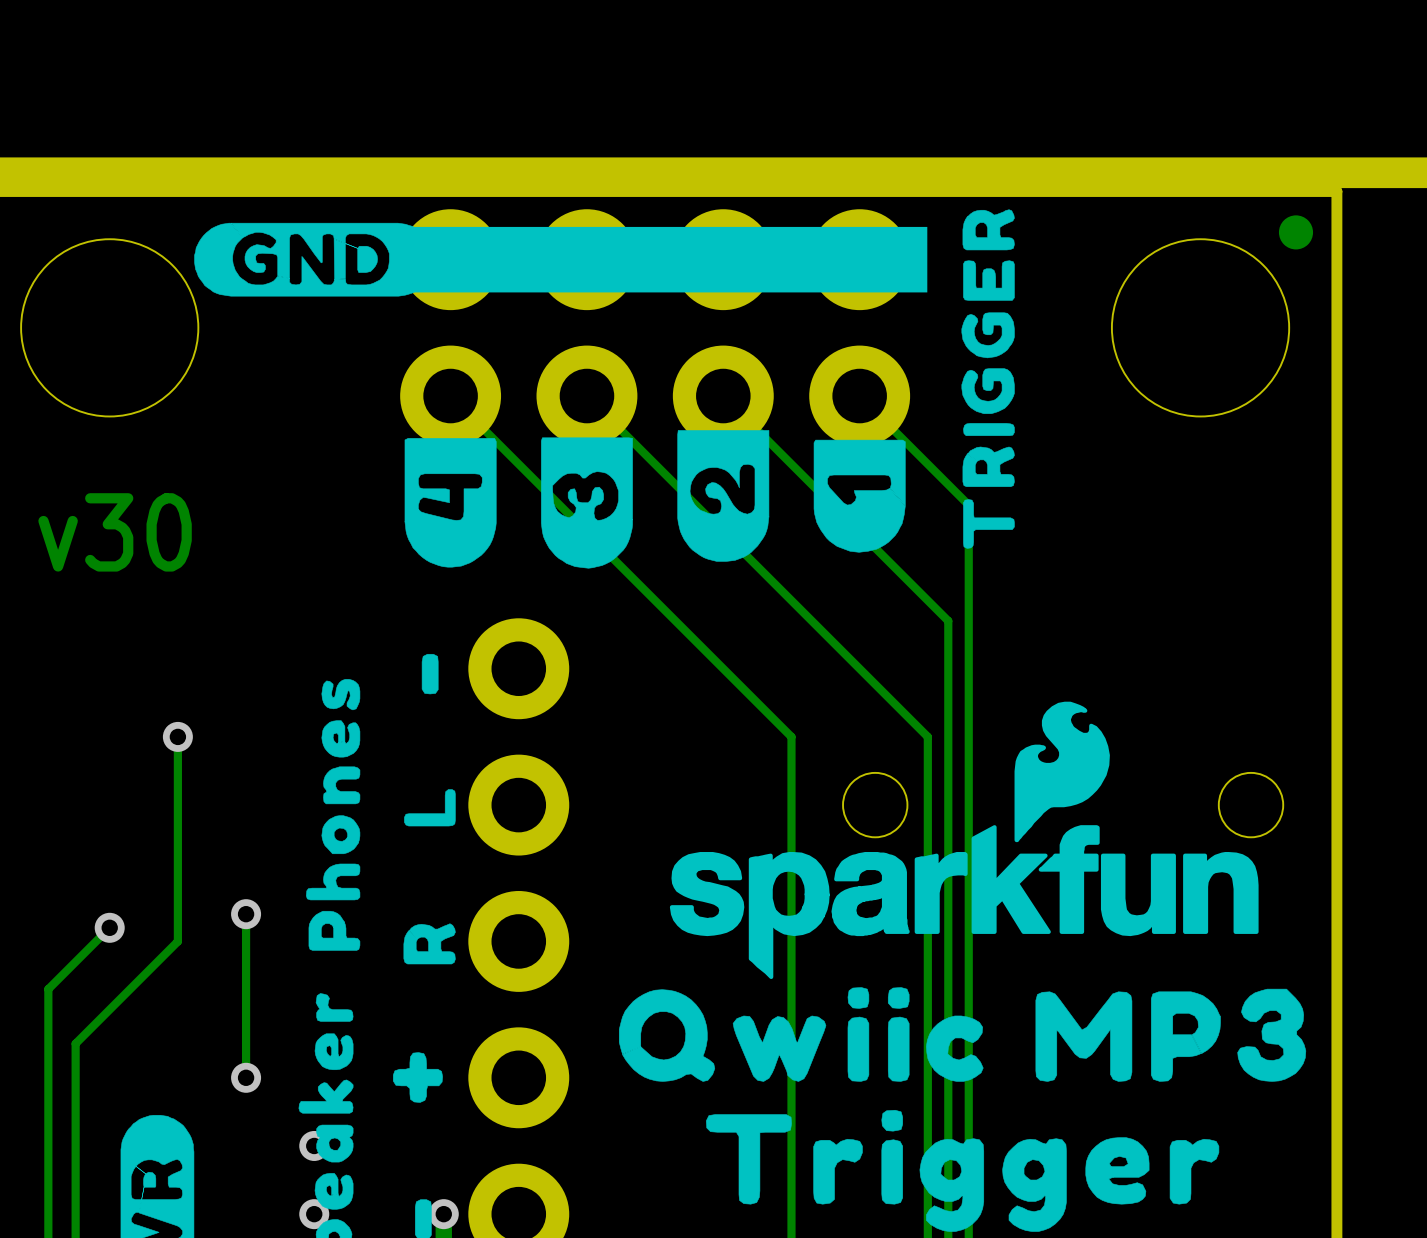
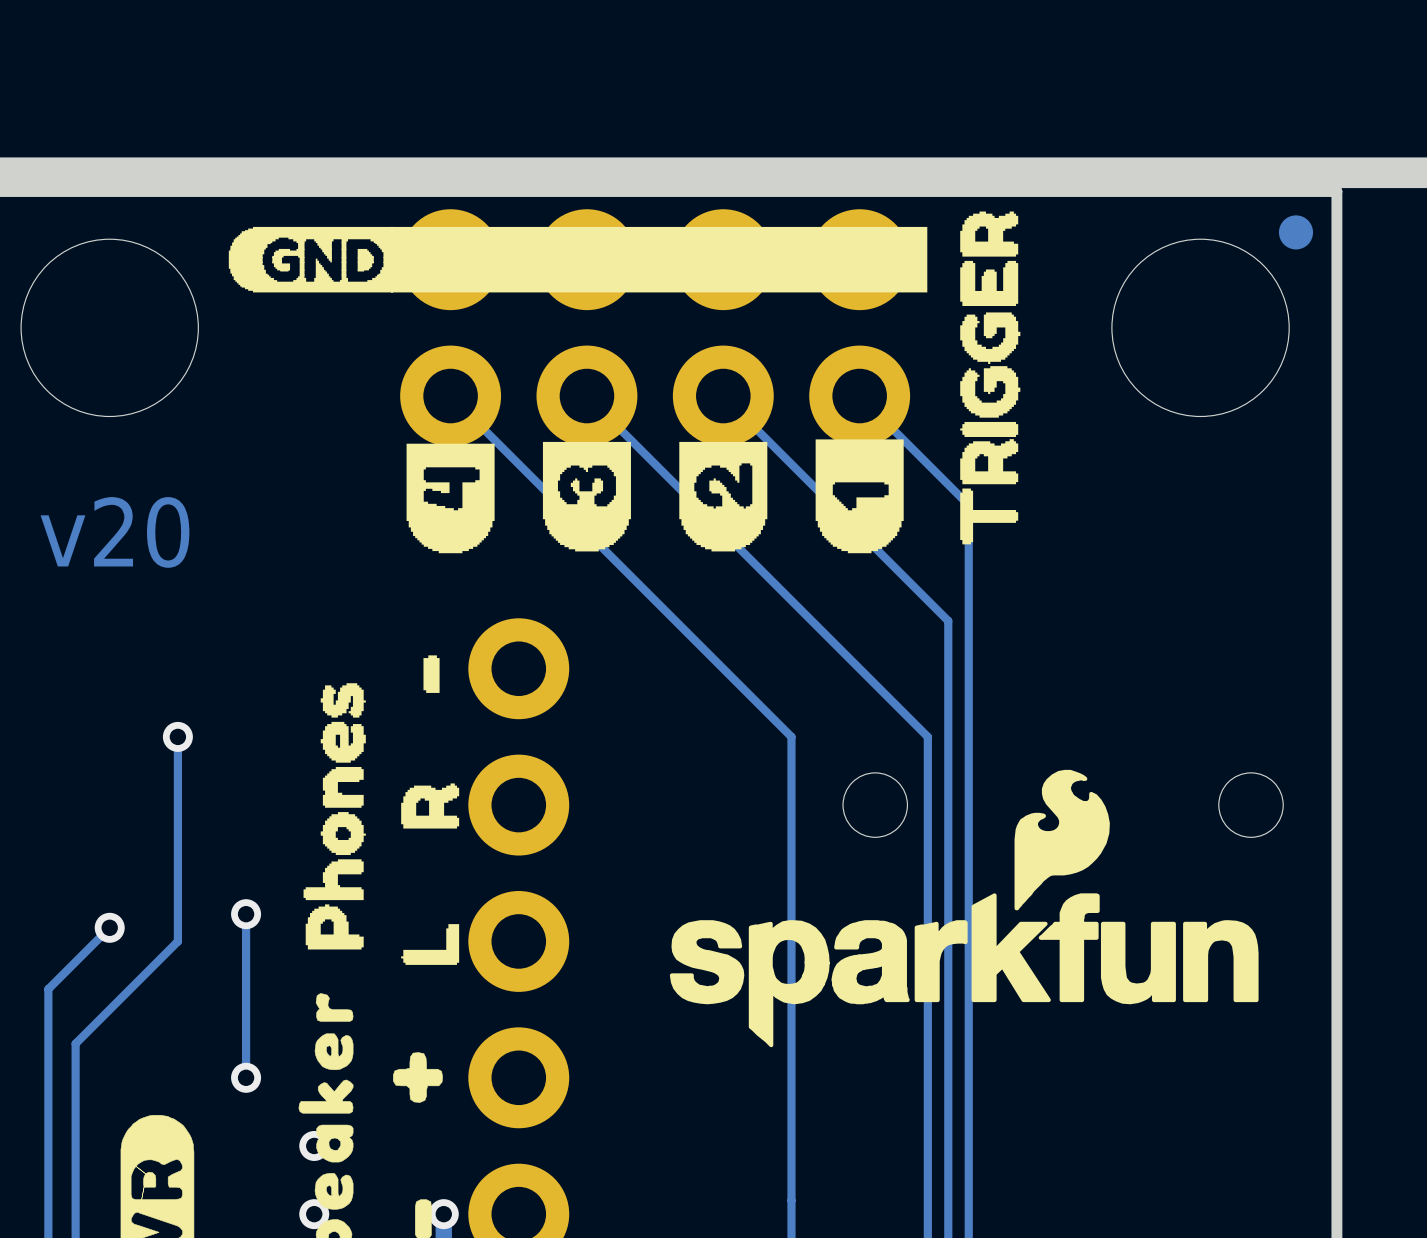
drawing shape: [961, 209, 1015, 549] -> [960, 211, 1021, 545]
drawing shape: [194, 222, 435, 297] -> [228, 226, 418, 293]
drawing shape: [677, 430, 770, 562] -> [679, 441, 768, 552]
drawing shape: [541, 437, 633, 569] -> [542, 441, 631, 552]
drawing shape: [404, 438, 497, 568] -> [406, 443, 495, 554]
drawing shape: [813, 439, 906, 553] -> [815, 439, 904, 554]
text: v30 (115, 532) -> v20 (114, 532)
drawing shape: [421, 653, 439, 695] -> [423, 655, 440, 693]
drawing shape: [305, 679, 361, 951] -> [303, 683, 366, 950]
drawing shape: [404, 789, 456, 827] -> [401, 783, 460, 829]
drawing position: (964, 840) -> (964, 908)
drawing shape: [403, 923, 456, 965] -> [401, 924, 460, 965]
drawing: [619, 987, 1307, 1232] -> none

